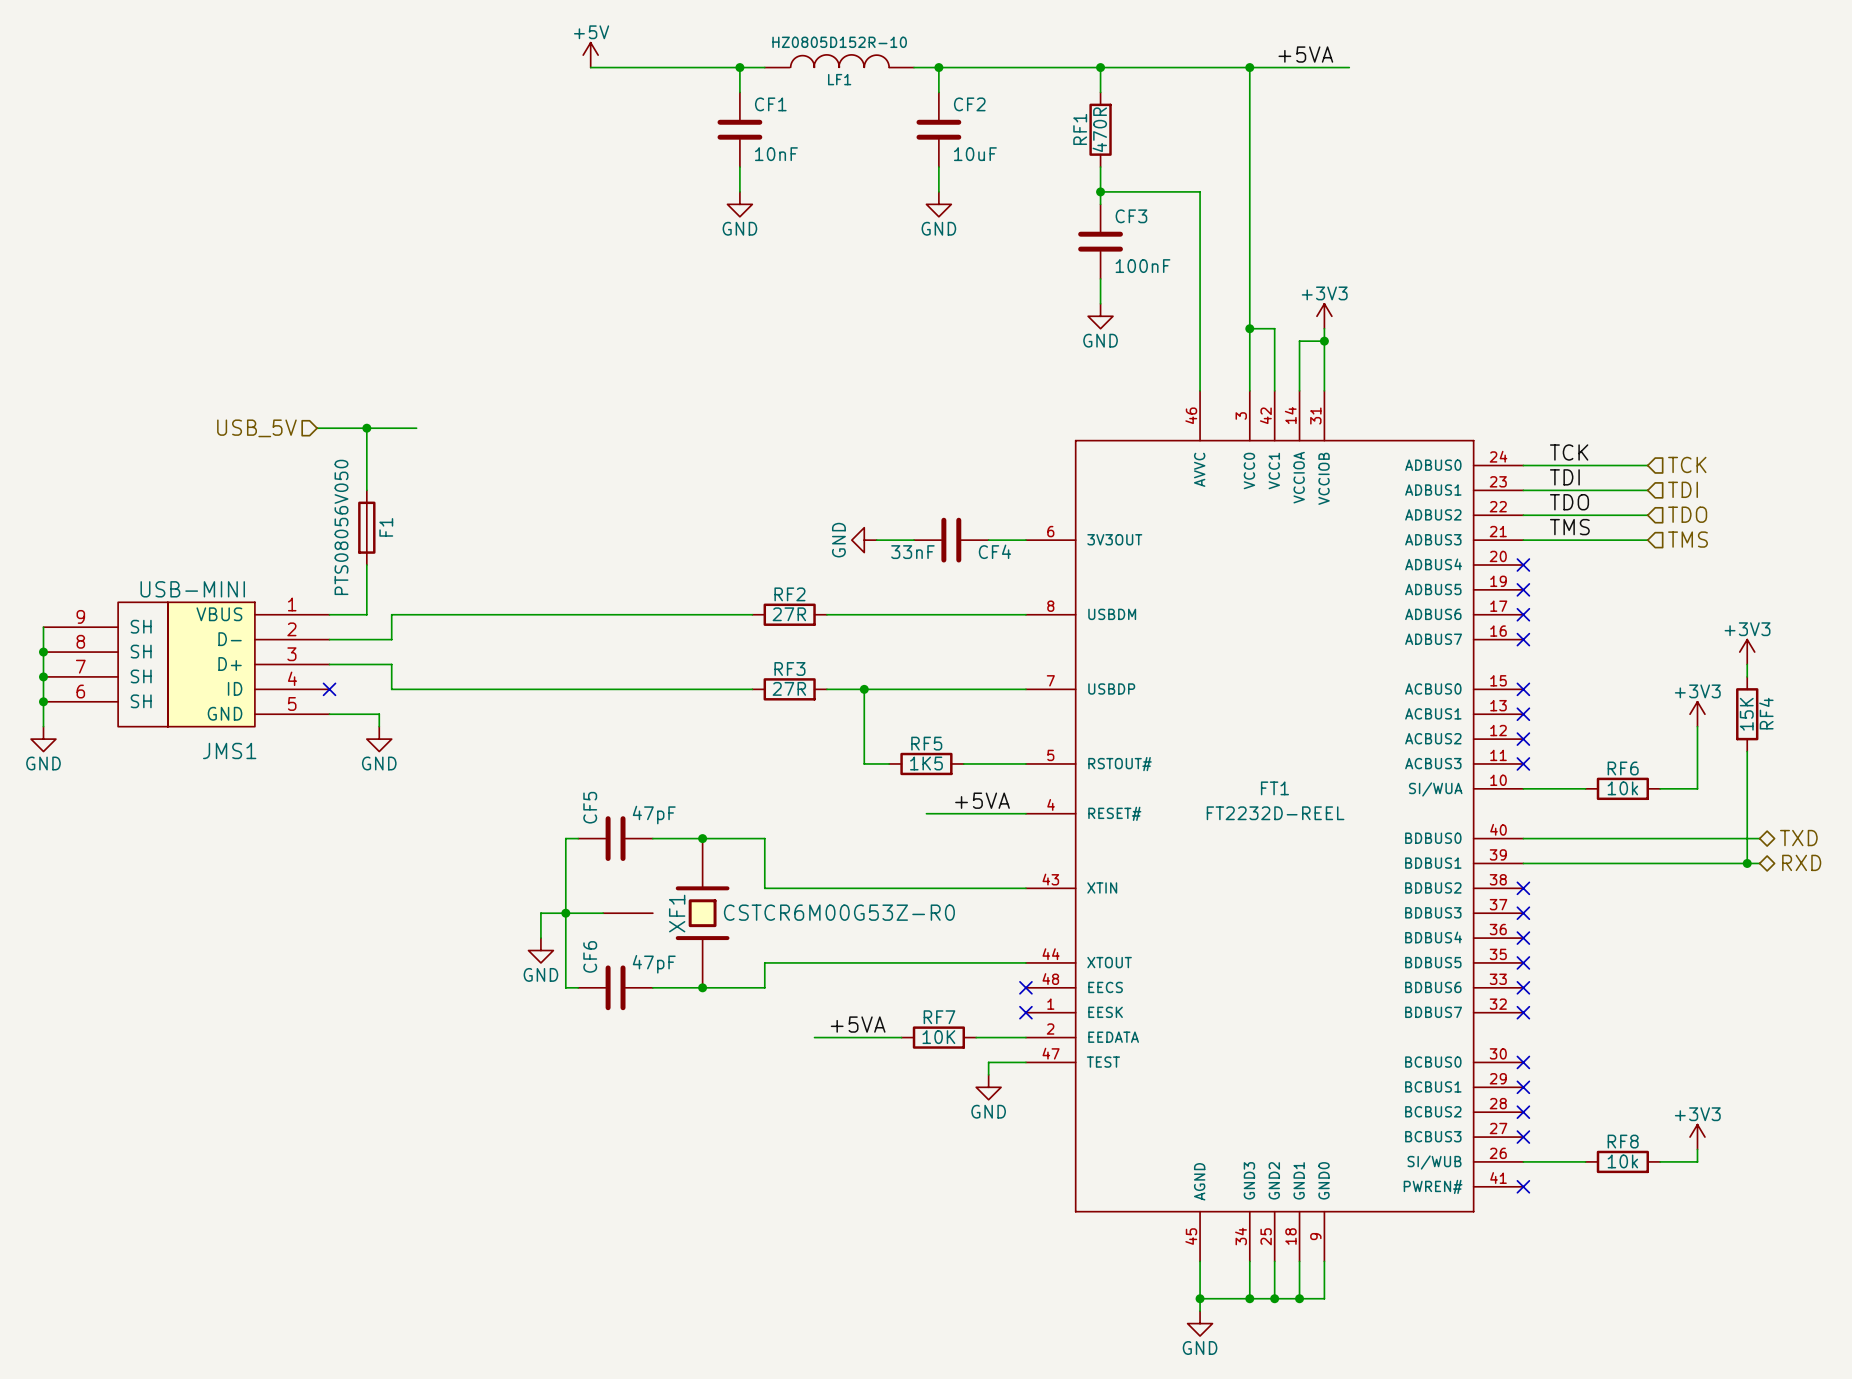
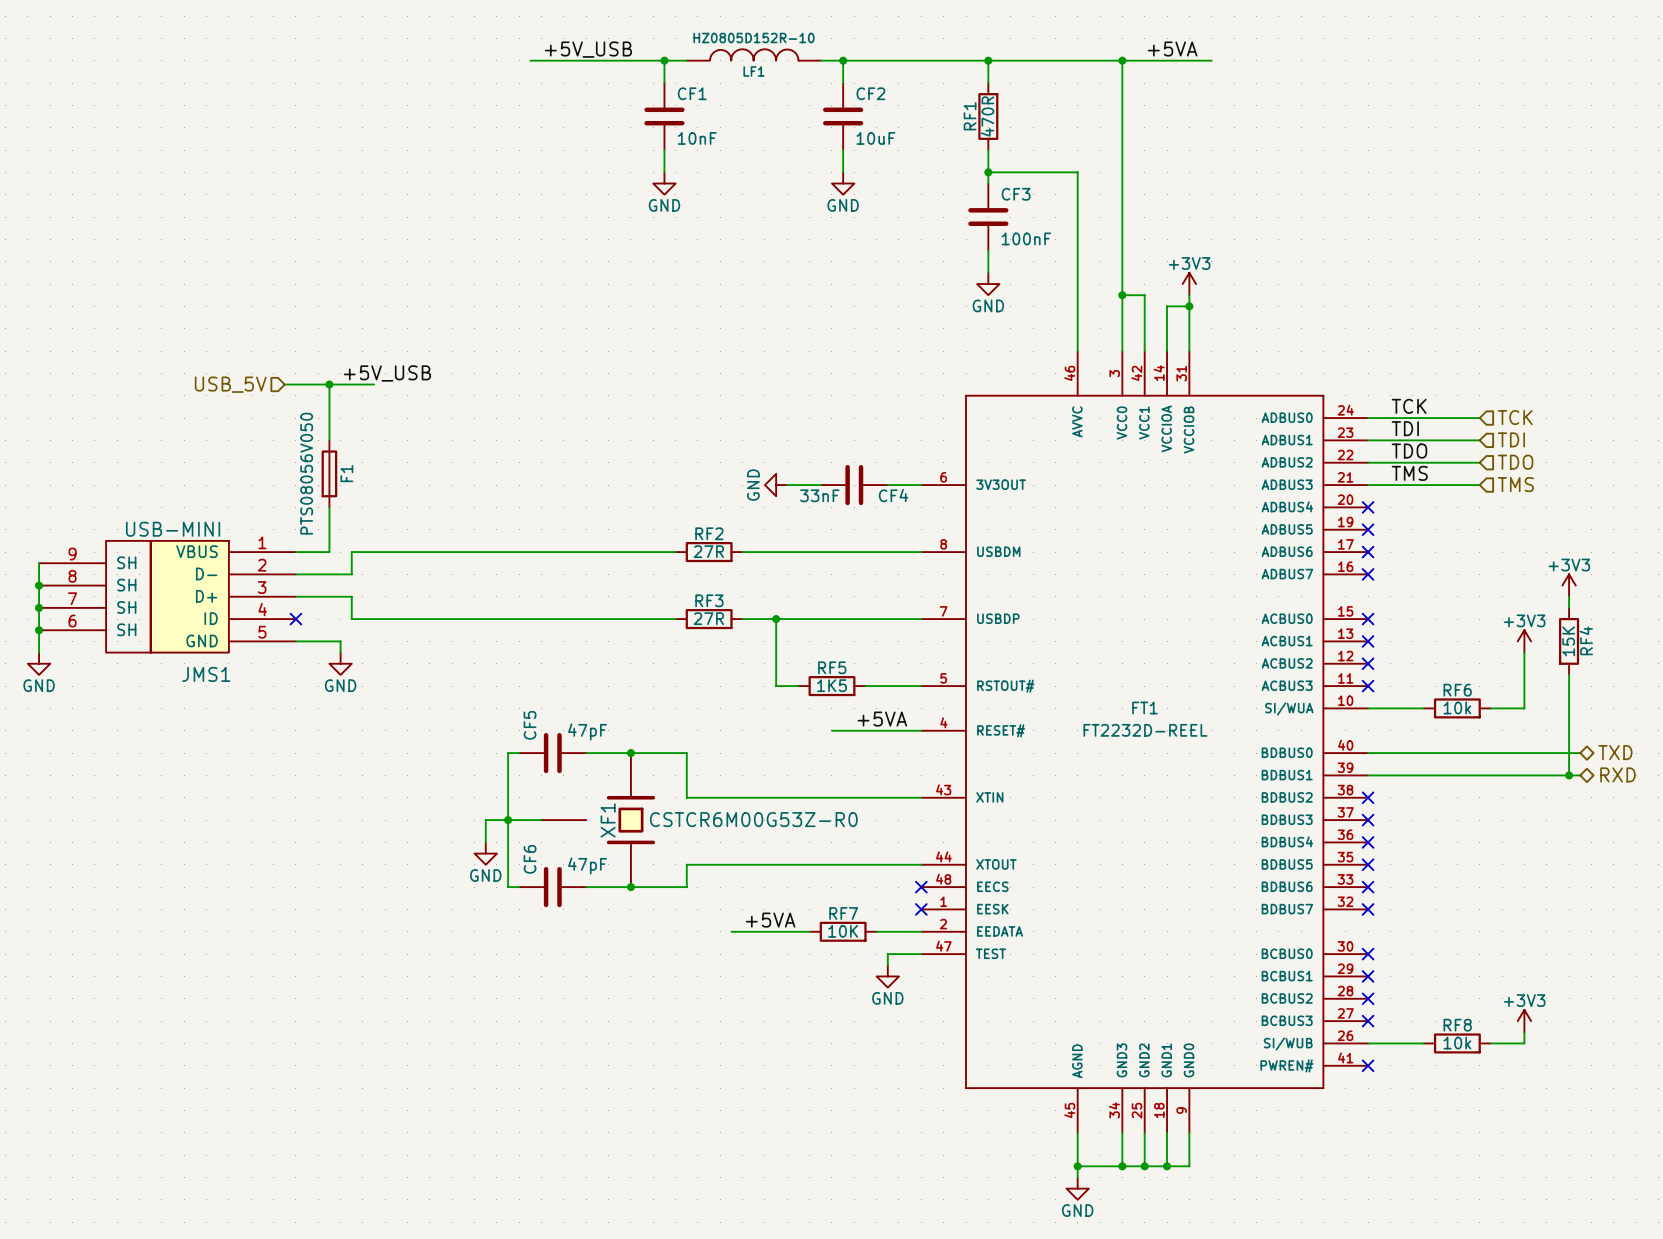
power symbol: +5V (590, 55) -> none
label: none -> +5V_USB (588, 49)
label: none -> +5V_USB (387, 373)

